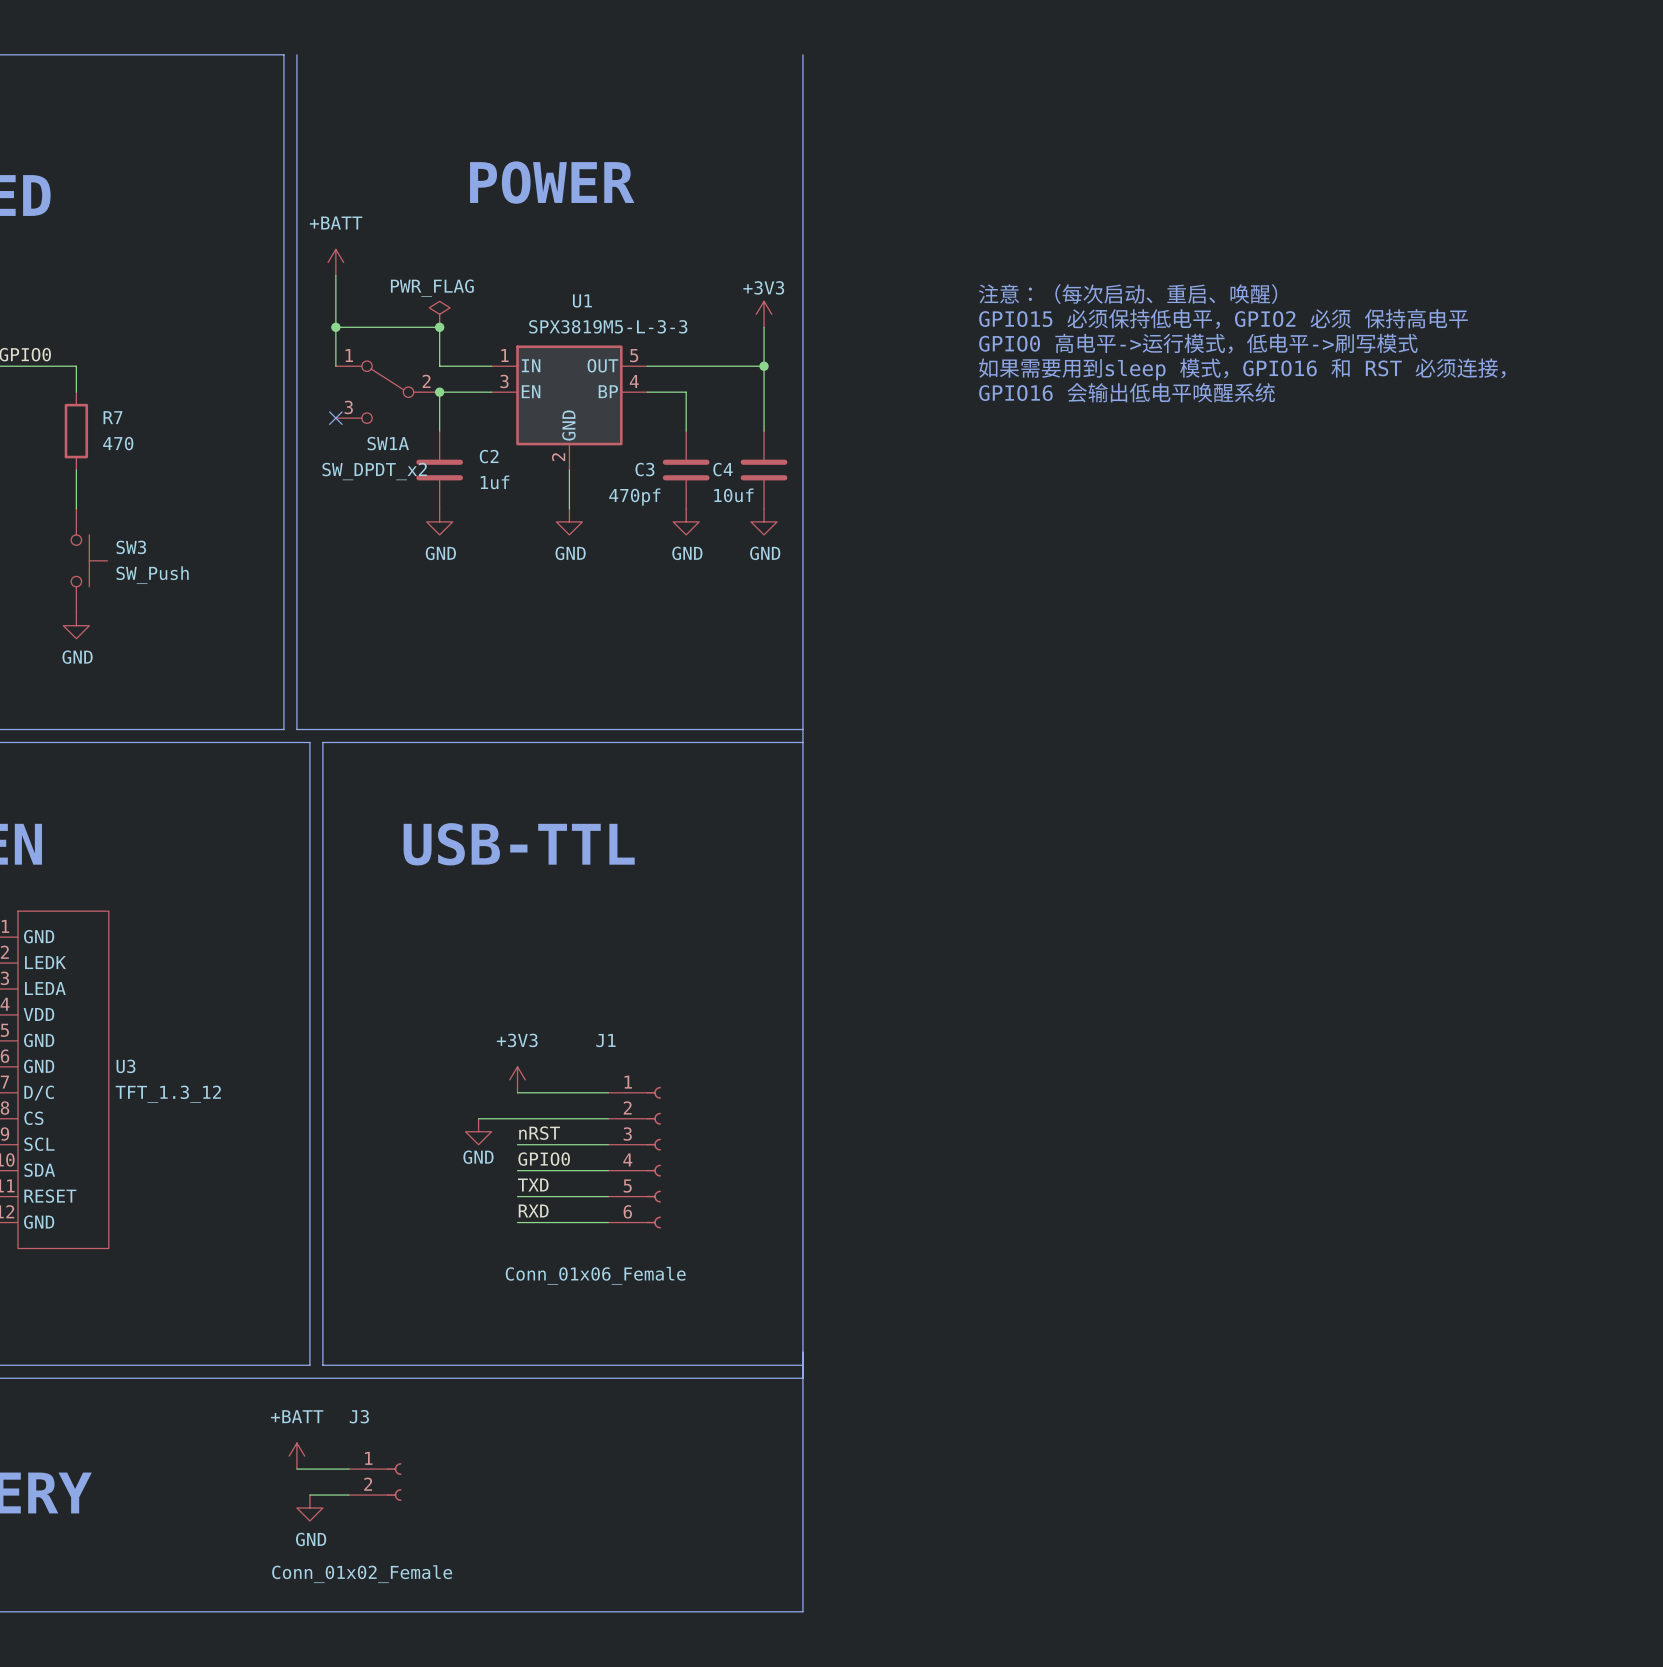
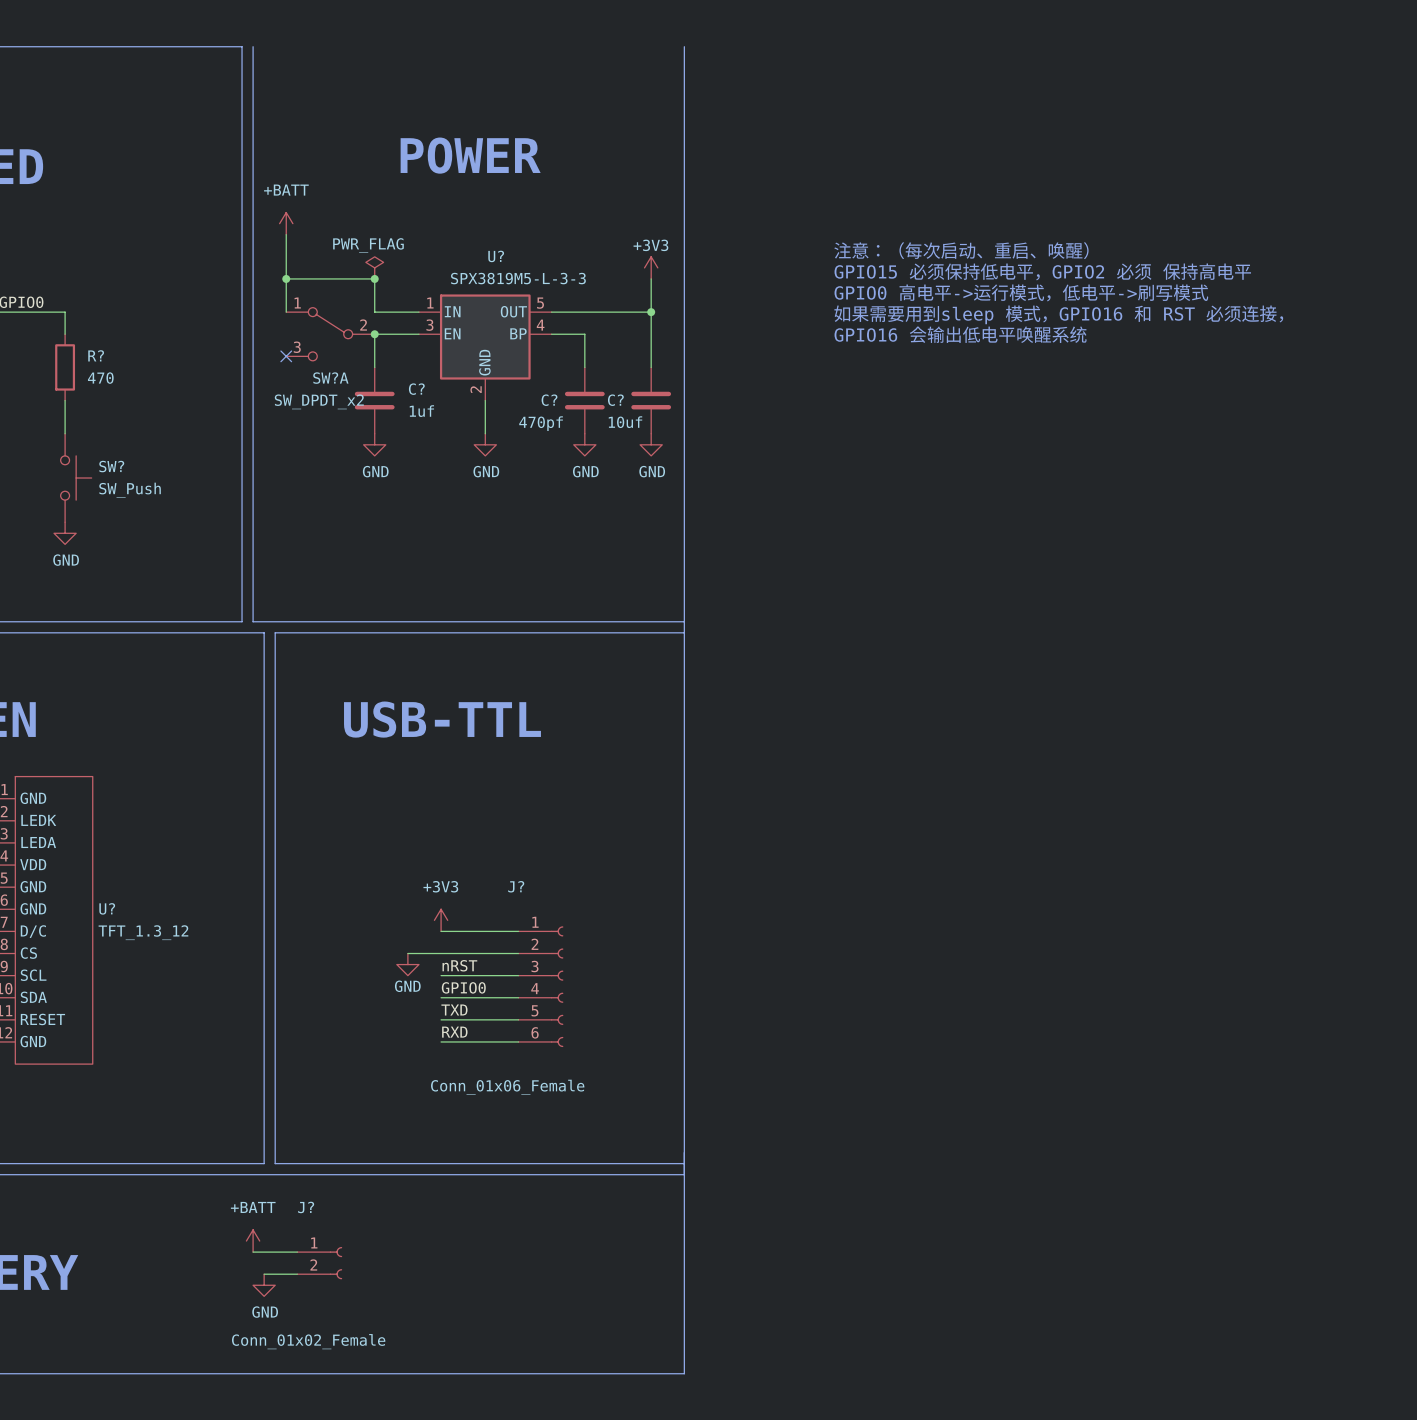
U1 name: U1 (582, 300) -> U? (496, 256)
R7 name: R7 (112, 417) -> R? (96, 355)
SW1A name: SW1A (388, 443) -> SW?A (330, 378)
C2 name: C2 (489, 456) -> C? (416, 389)
C3 name: C3 (644, 469) -> C? (549, 400)
C4 name: C4 (723, 469) -> C? (615, 400)
SW3 name: SW3 (131, 547) -> SW? (111, 466)
J1 name: J1 (605, 1040) -> J? (516, 886)
U3 name: U3 (125, 1066) -> U? (107, 908)
J3 name: J3 (359, 1416) -> J? (306, 1207)

